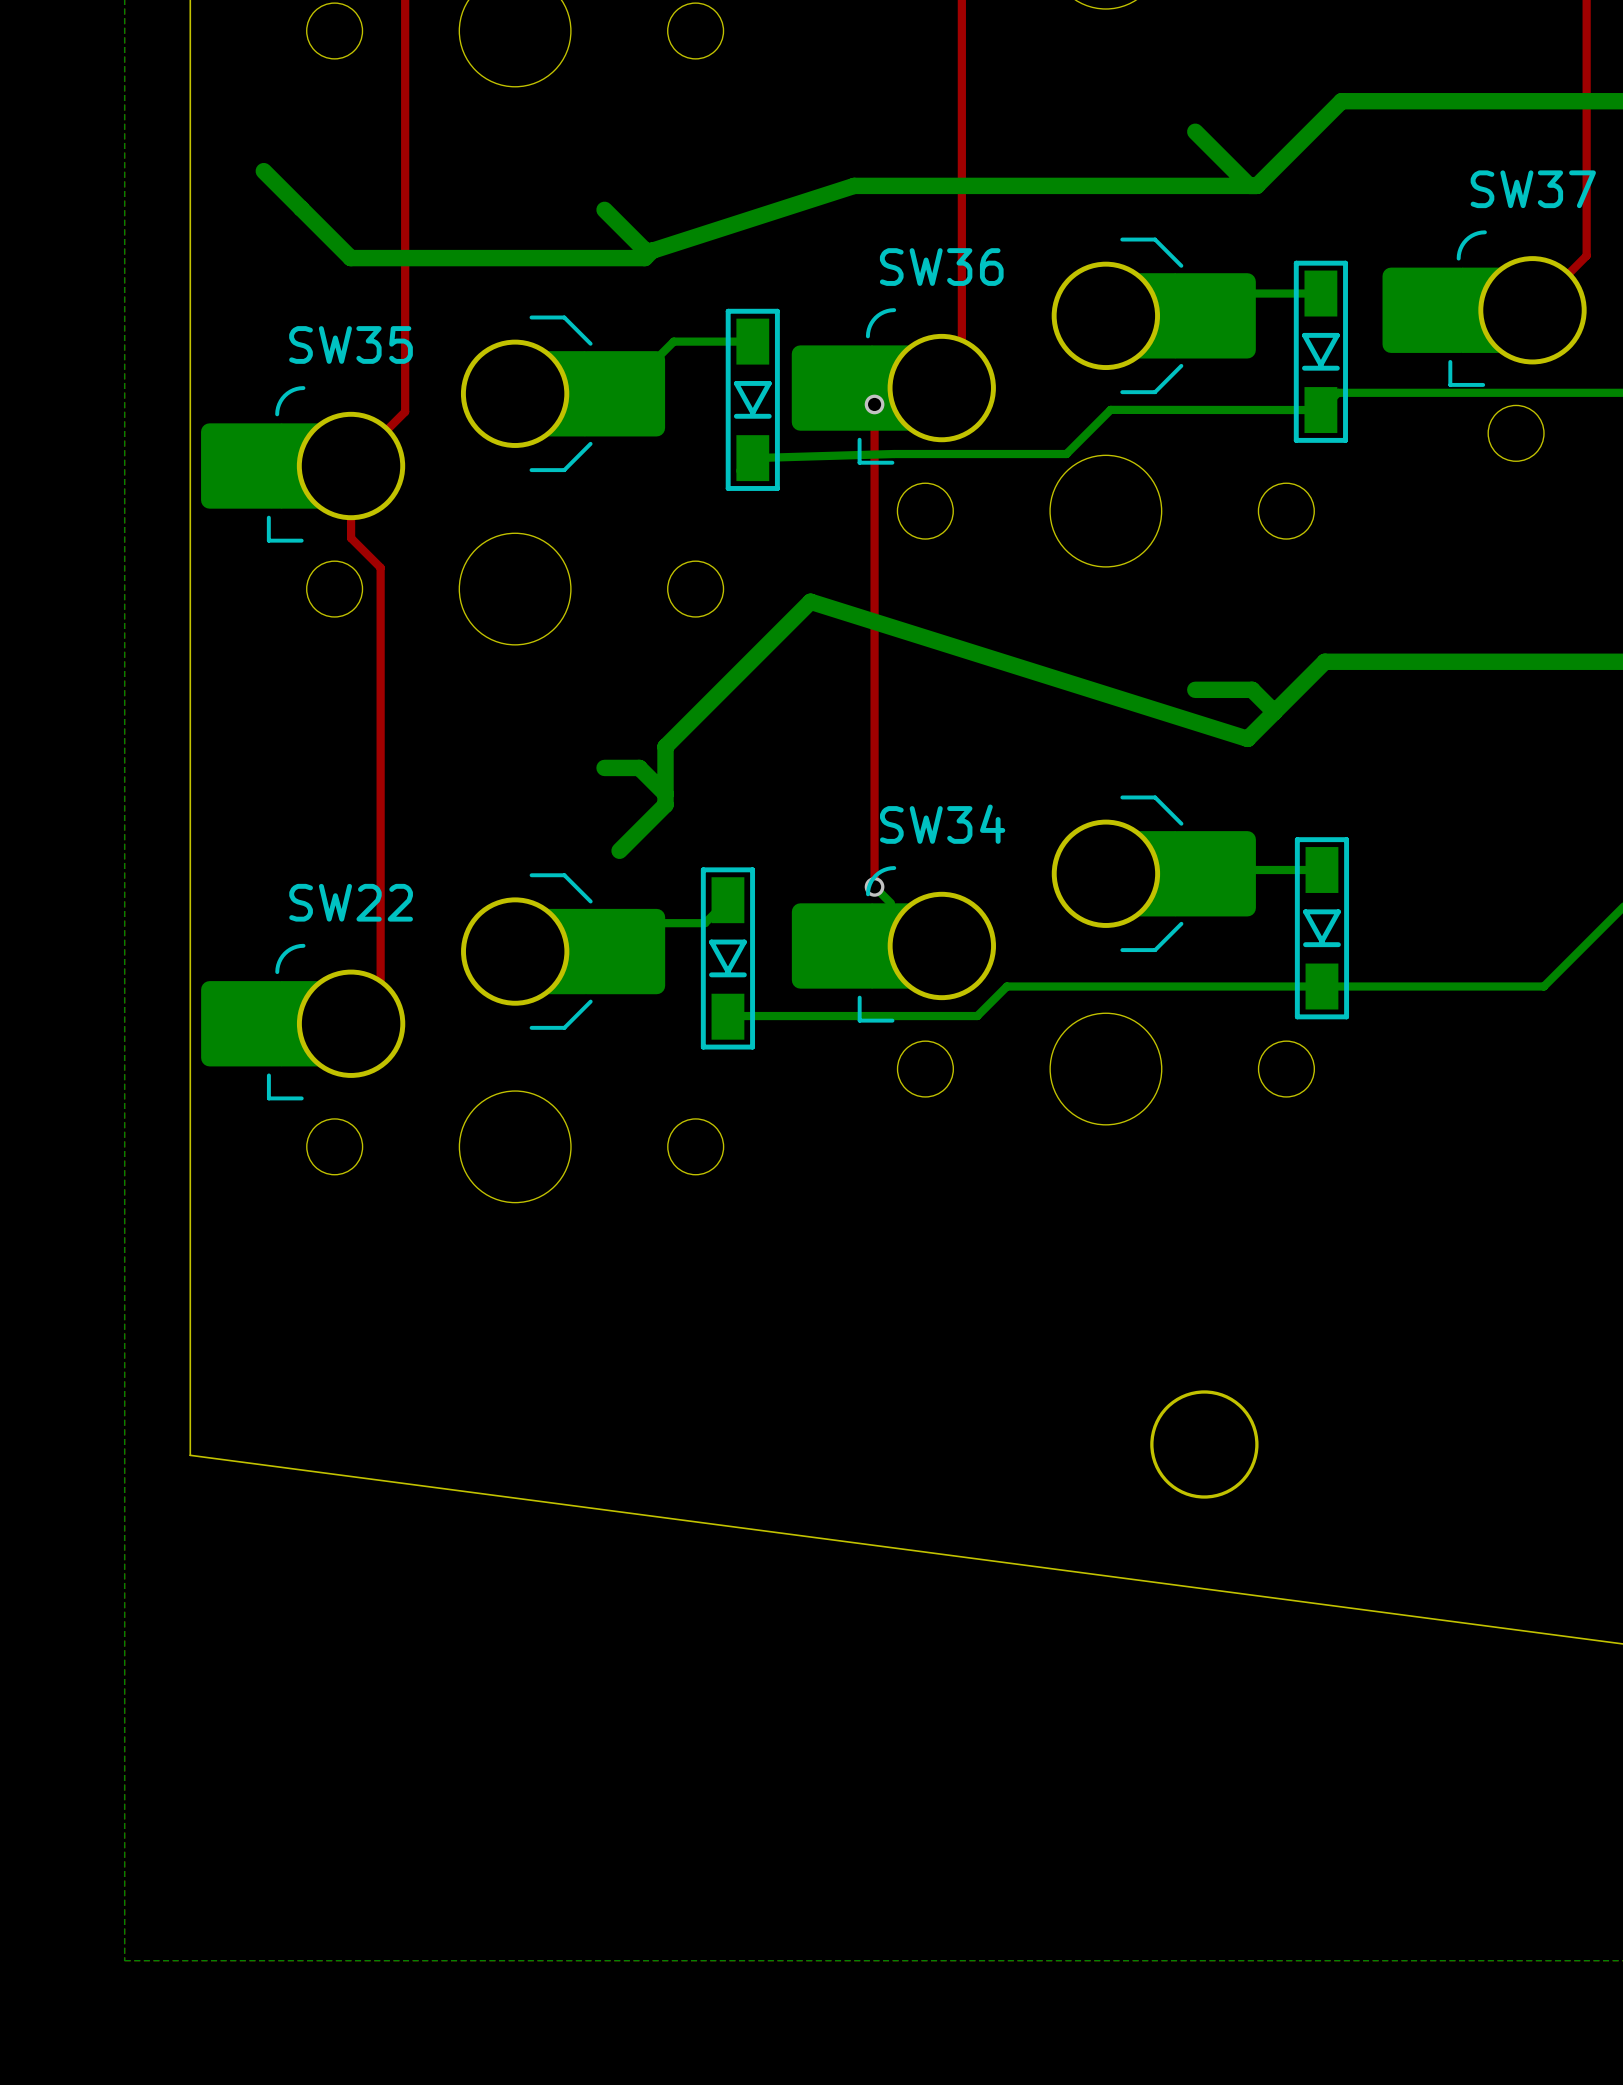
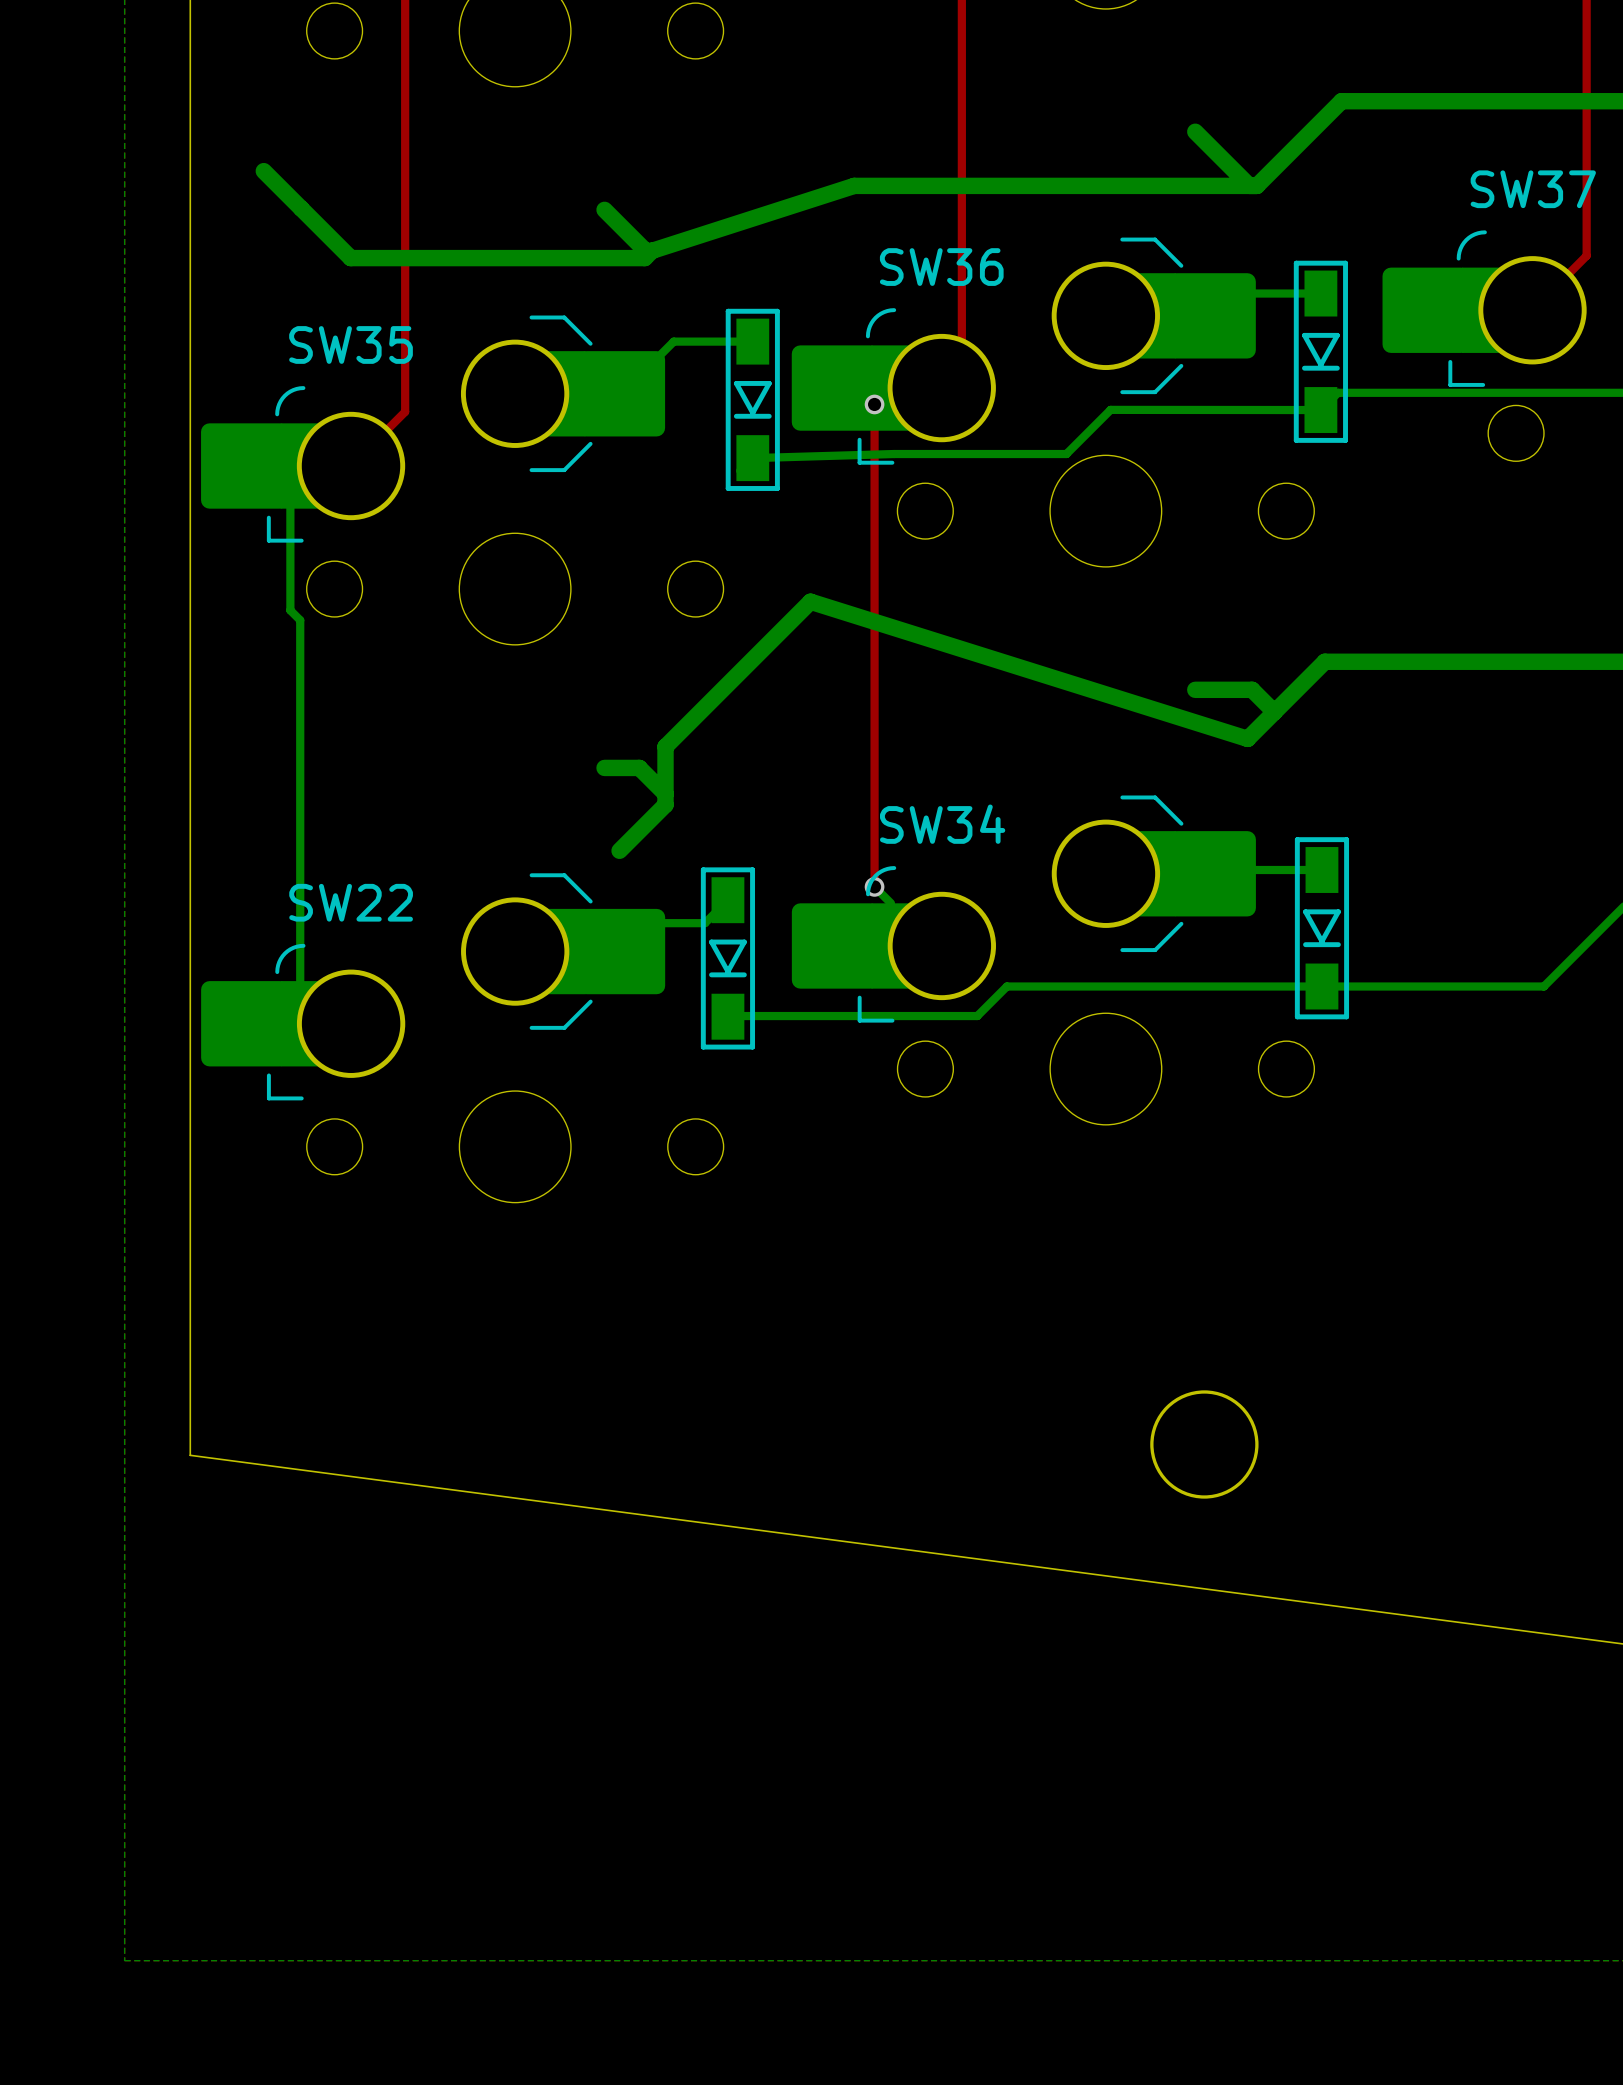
top track: (351, 466) (351, 538) (380, 567) (380, 981) -> none
bottom track: none -> (290, 505) (290, 610) (300, 620) (300, 1023)

